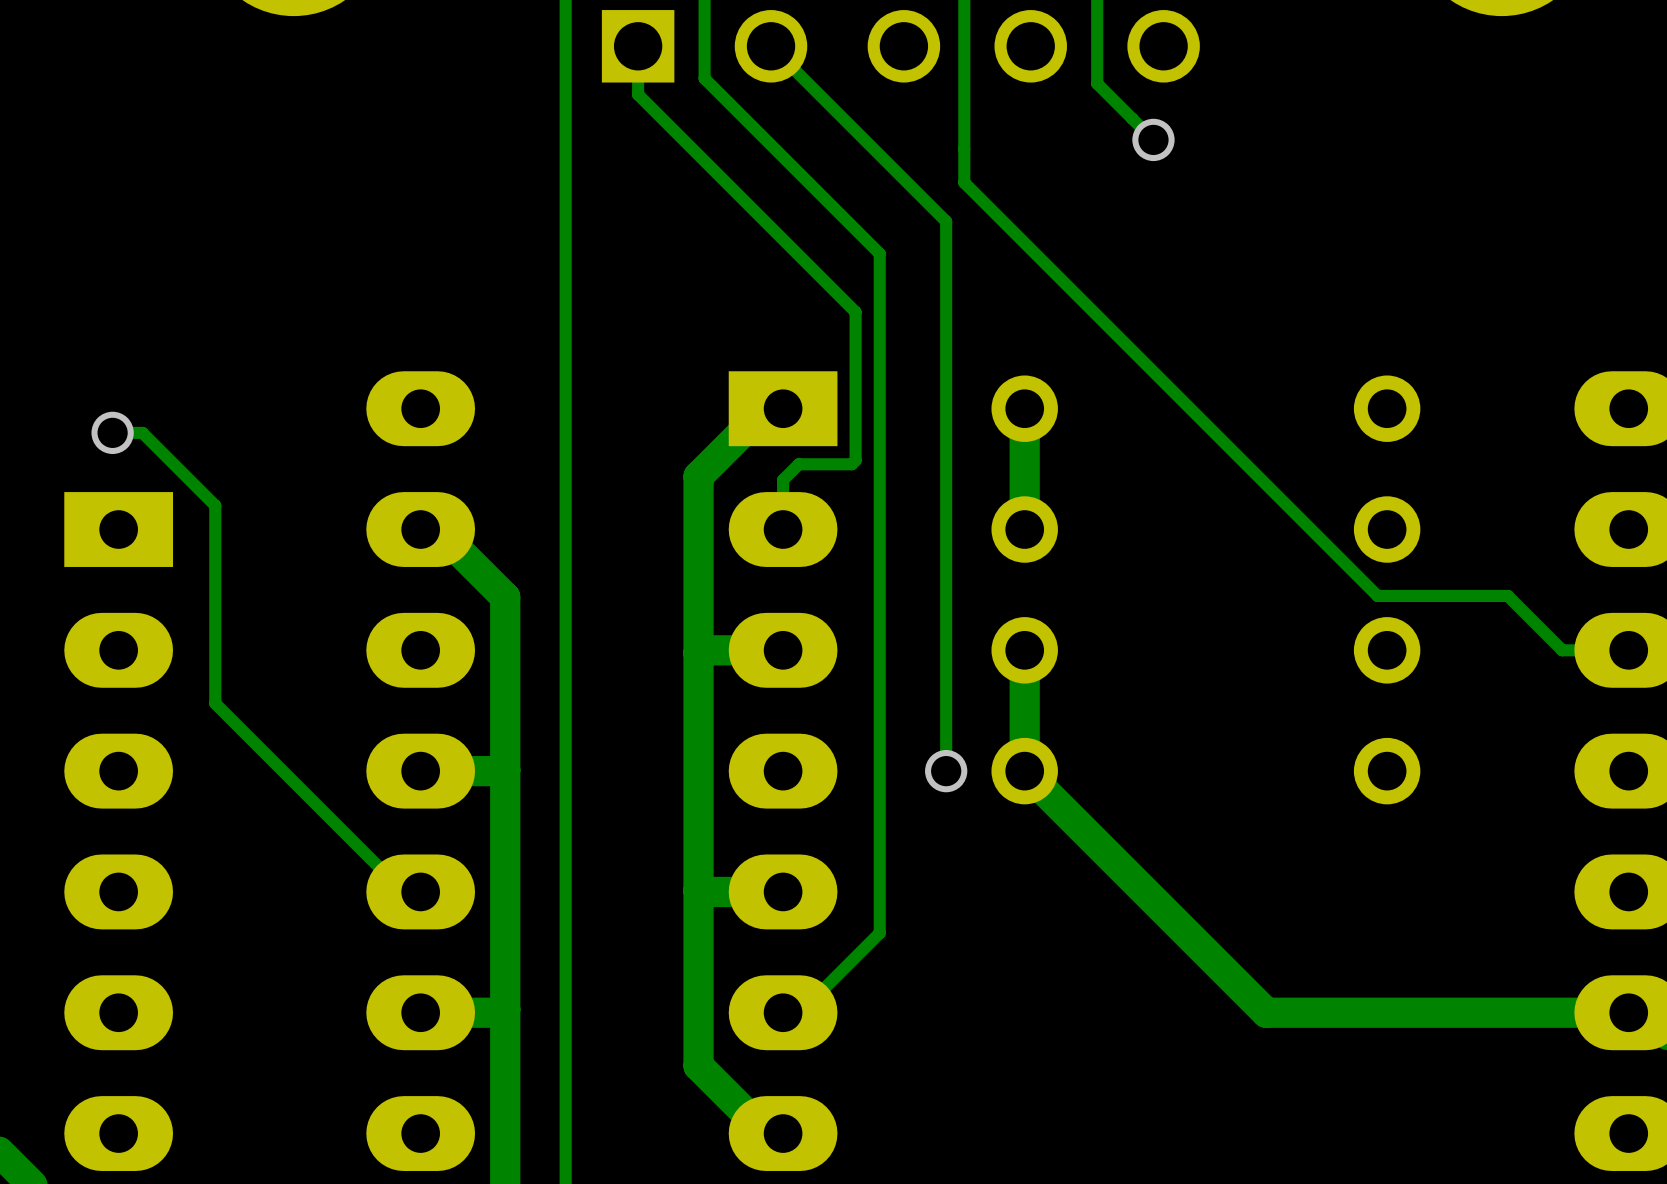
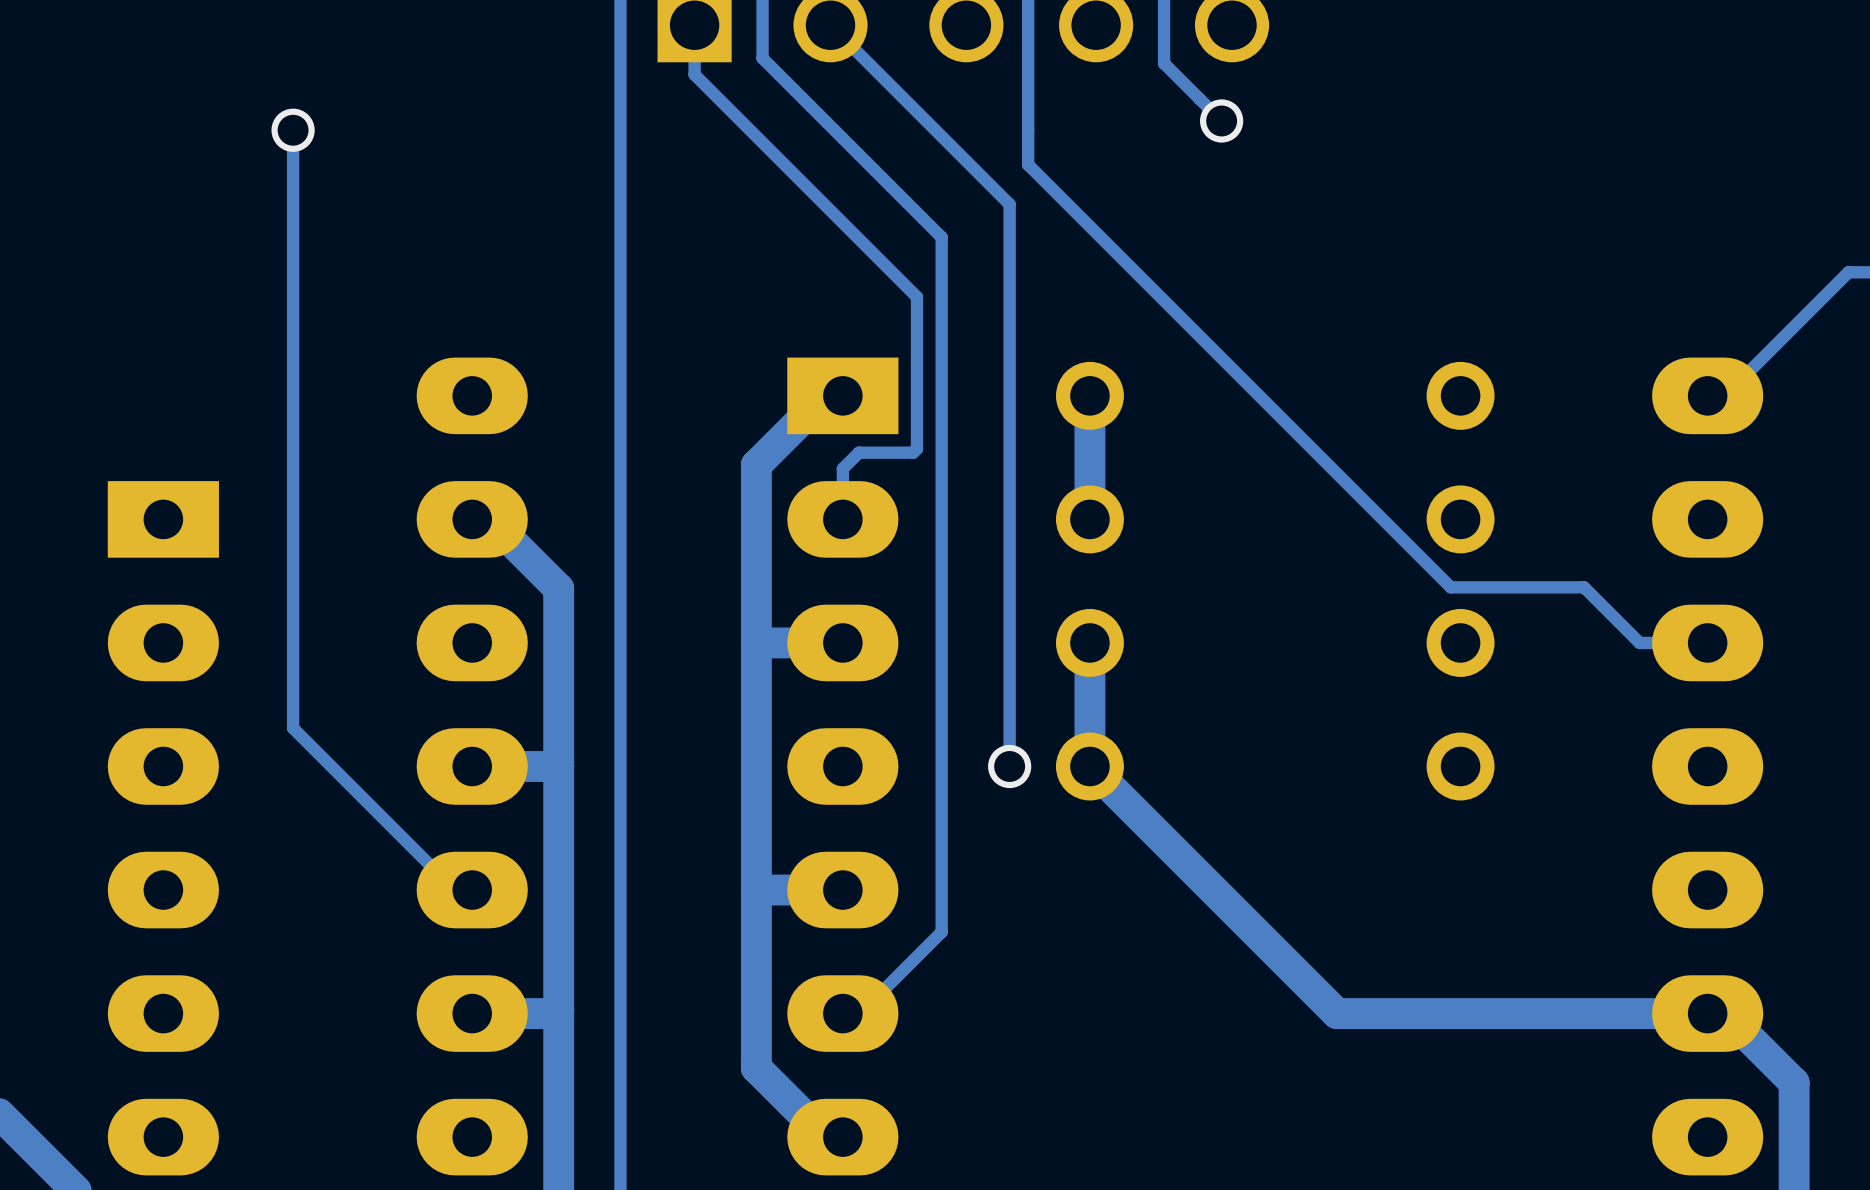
via: none -> (293, 130)
track: (112, 432) (142, 432) (215, 505) (215, 703) (245, 733) -> (293, 130) (293, 728)
via: (112, 432) -> none

